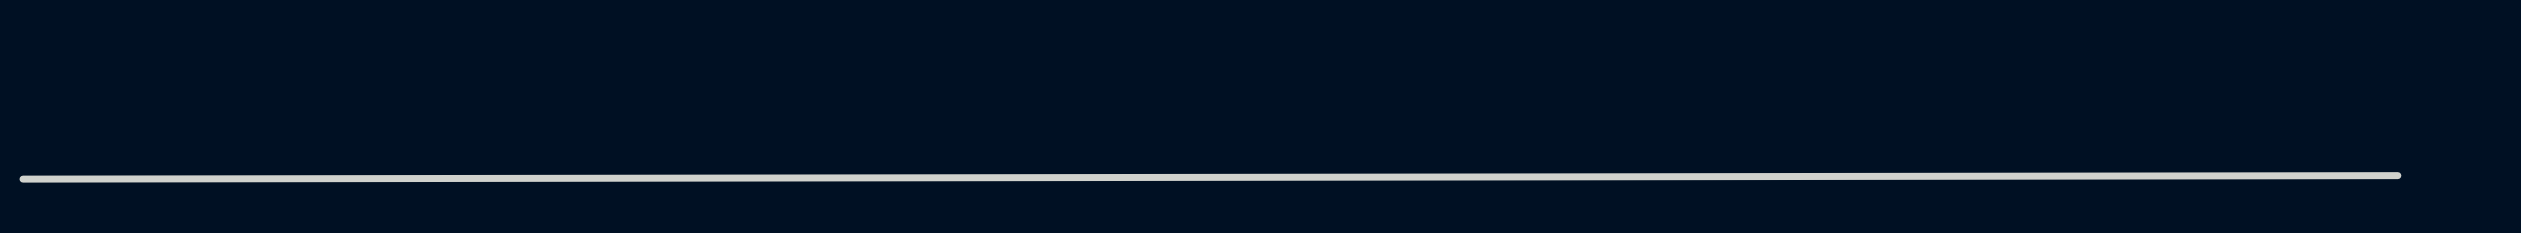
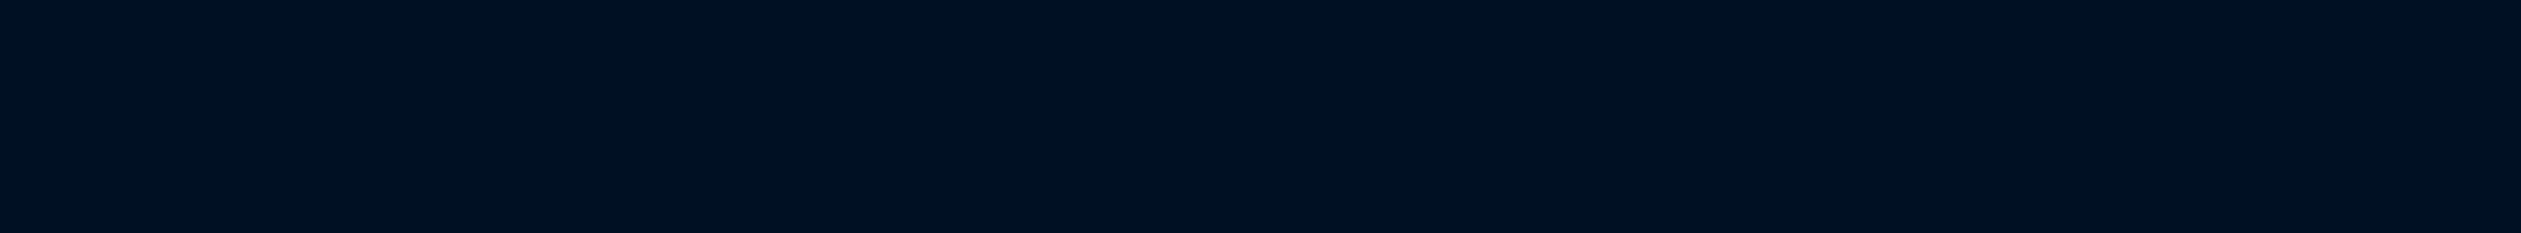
board edge: (2397, 175) (23, 179) -> none

